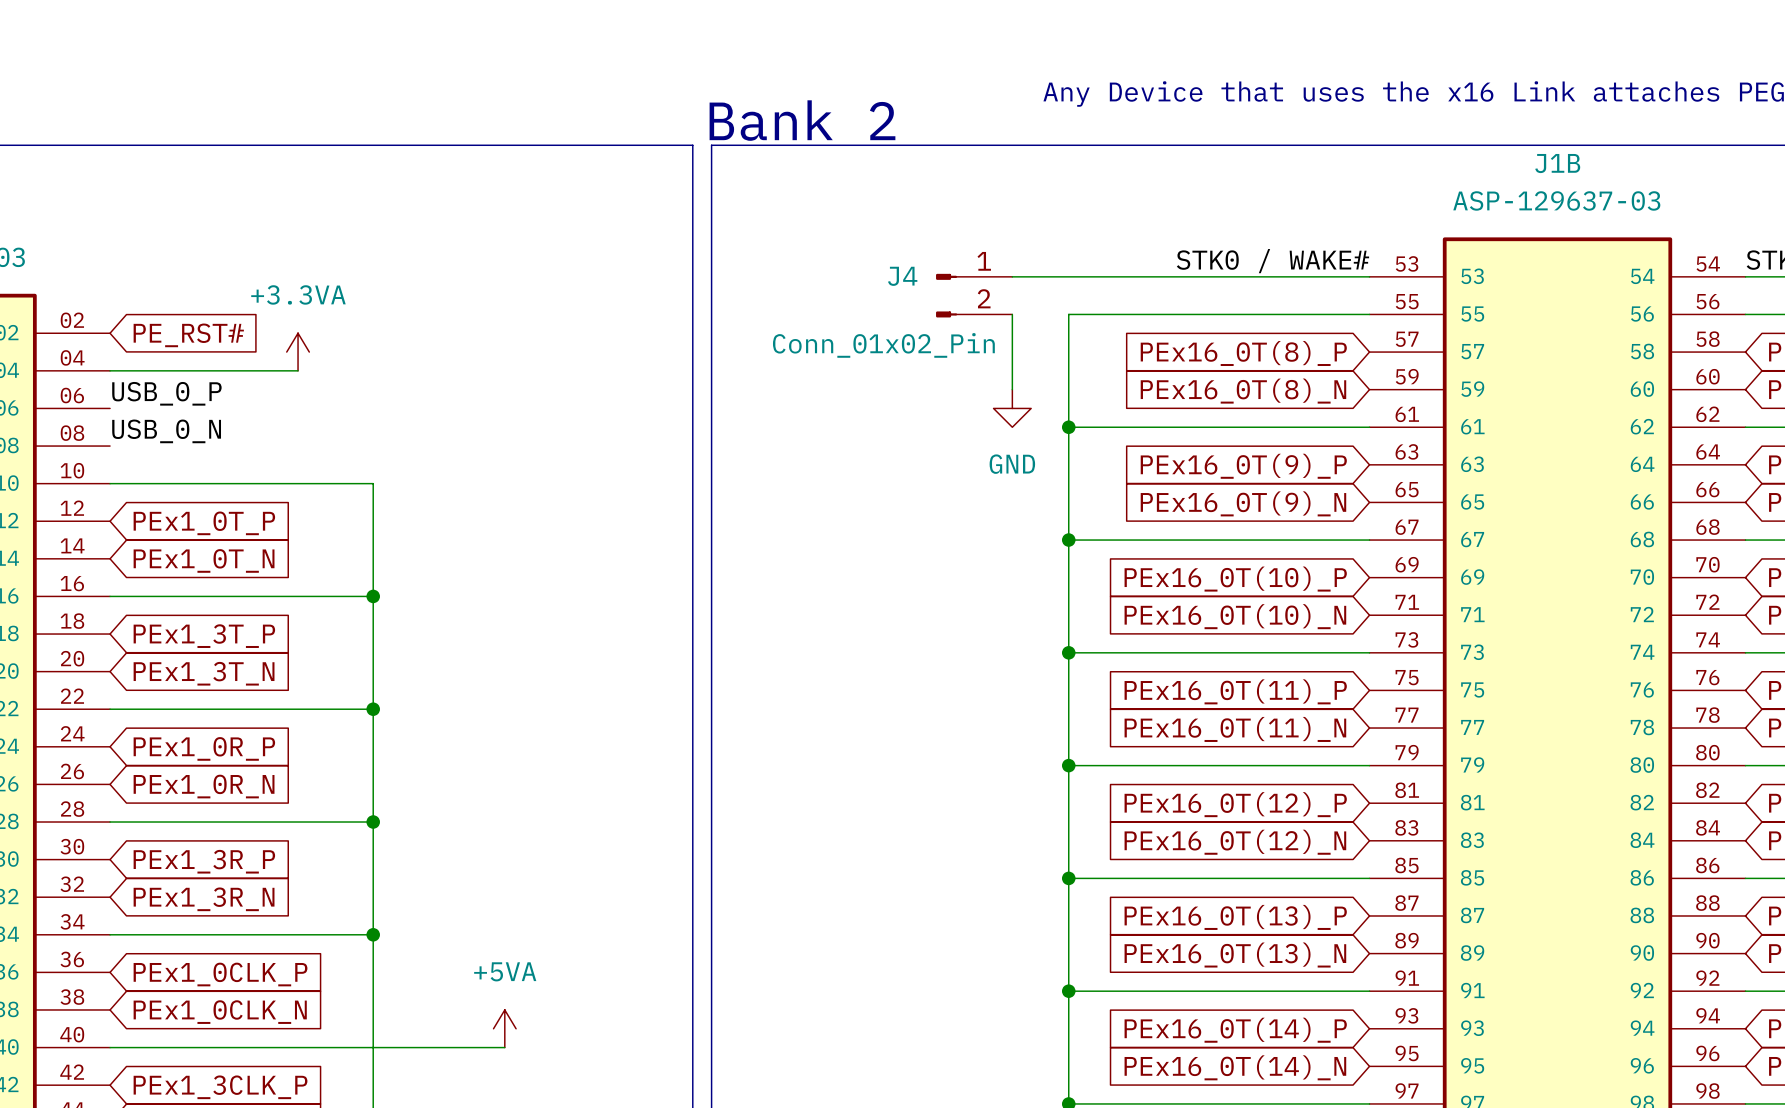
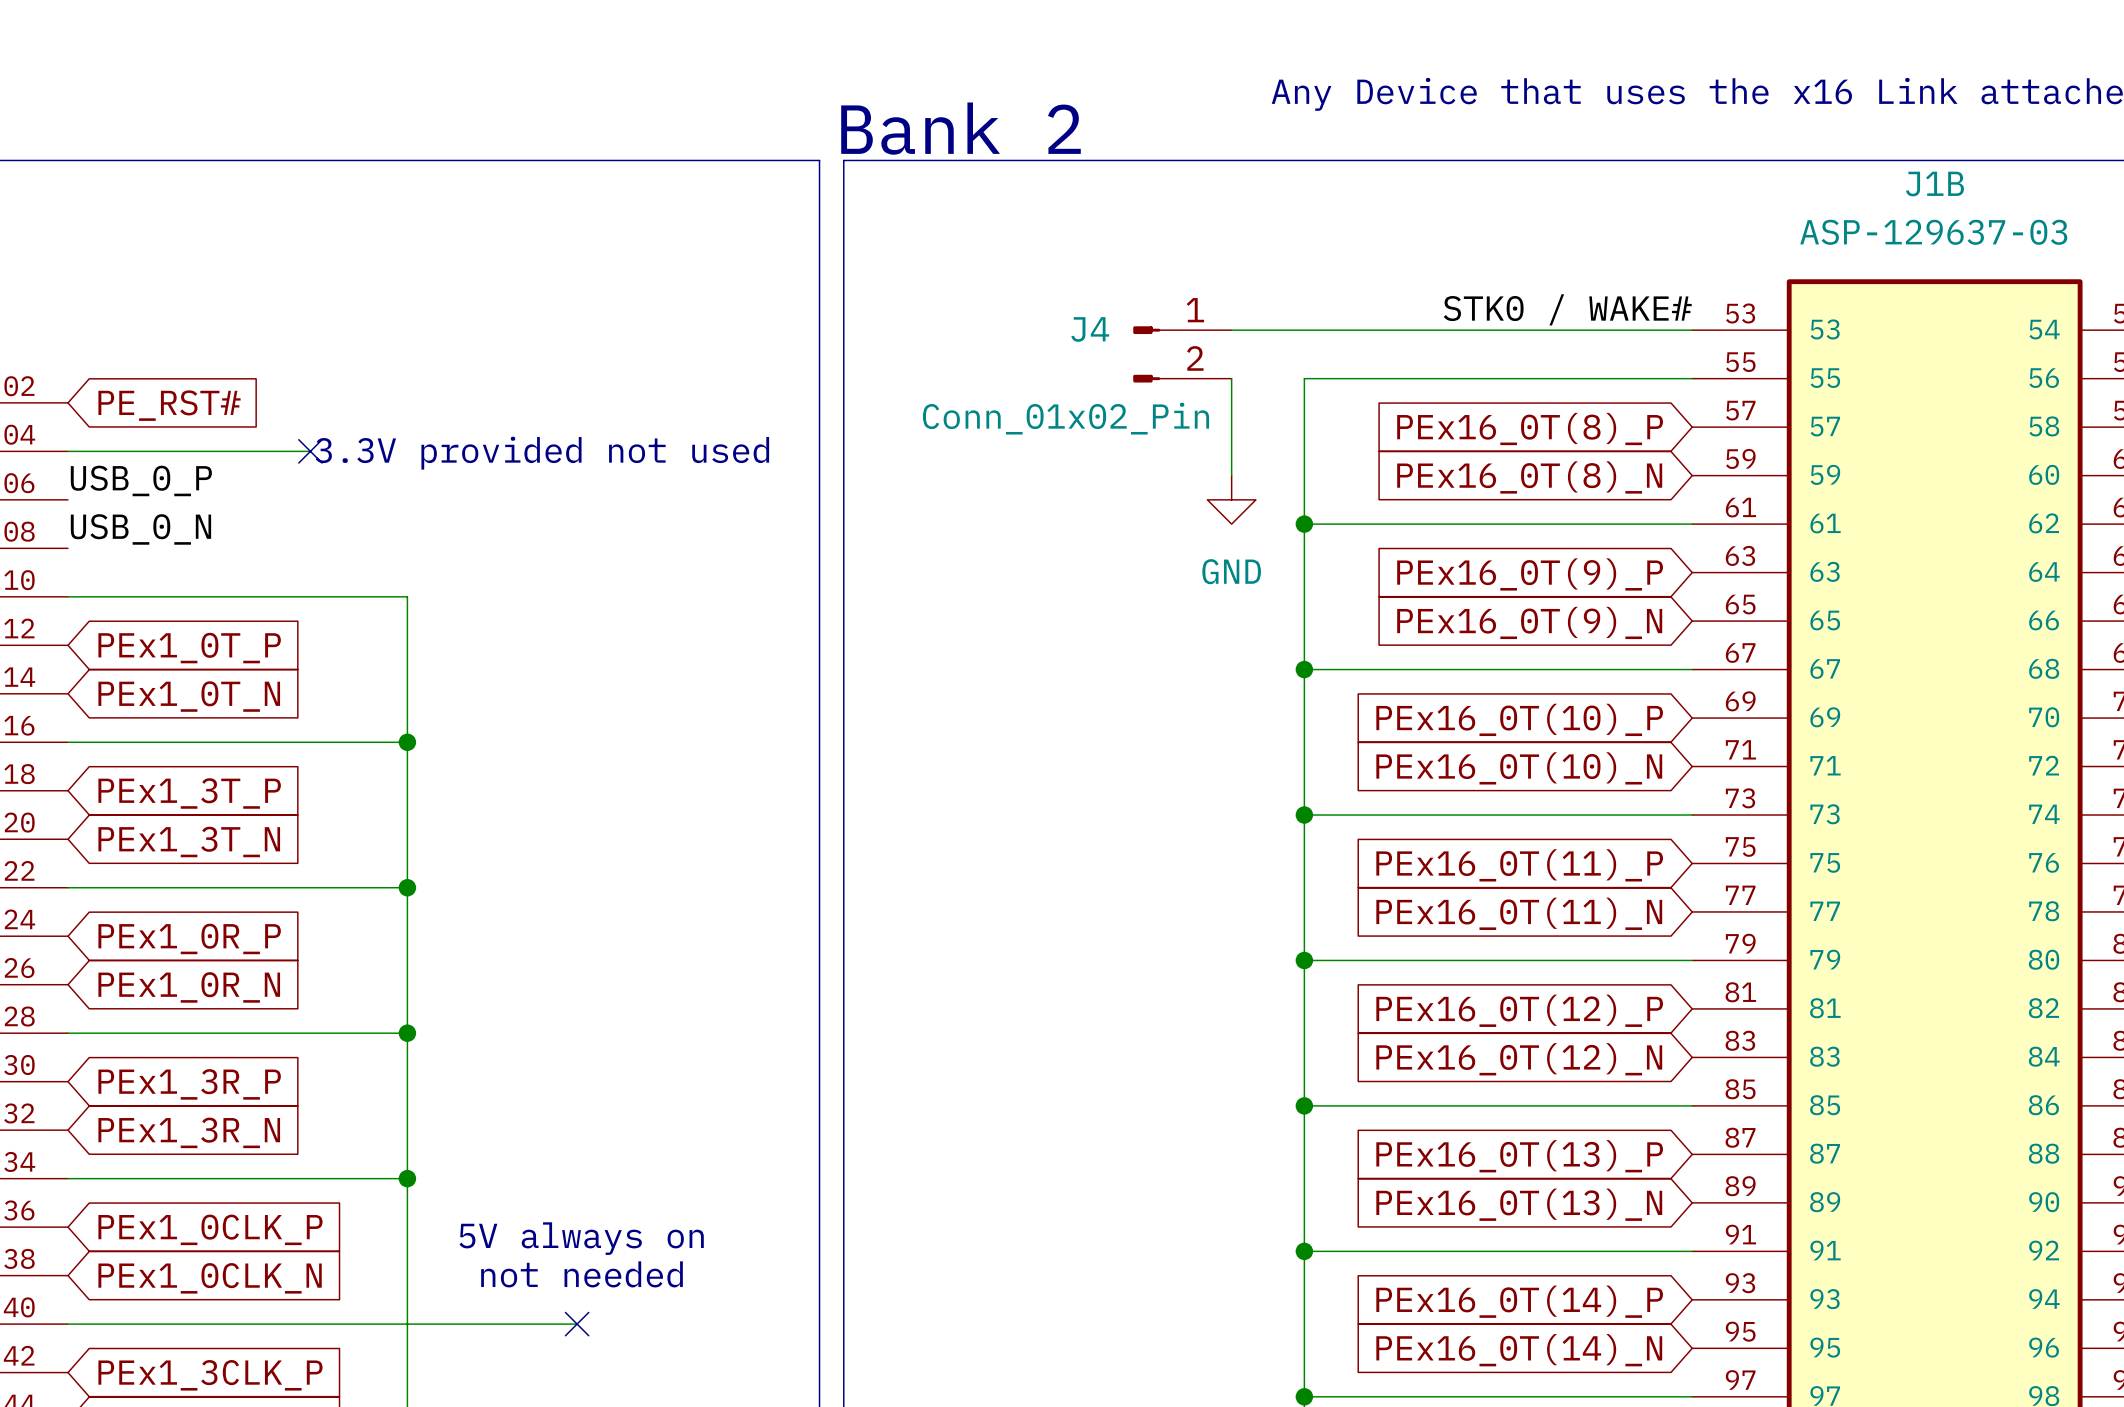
power symbol: +3.3VA (298, 352) -> none
no-connect mark: none -> (310, 451)
text: none -> 3.3V provided not used (542, 453)
text: none -> 5V always on (581, 1238)
text: none -> not needed (582, 1274)
power symbol: +5VA (504, 1028) -> none
no-connect mark: none -> (577, 1324)

